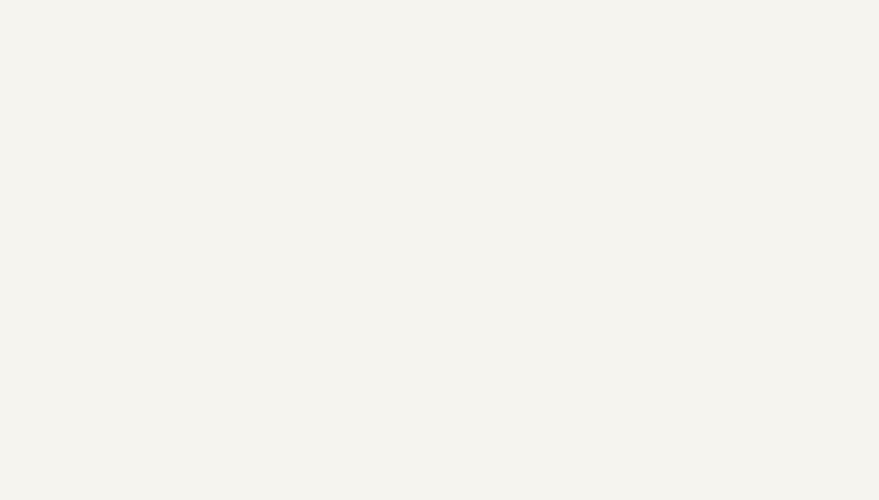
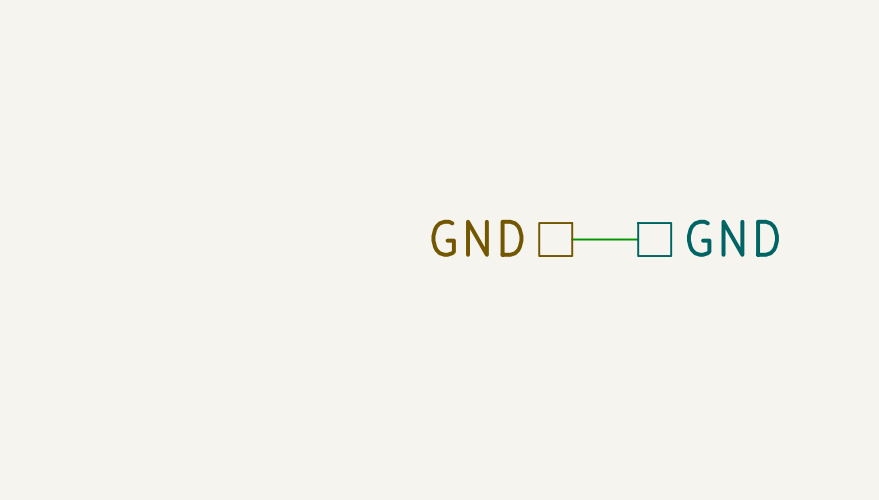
hierarchical label: none -> GND (477, 238)
sheet pin: none -> GND (732, 238)
wire: none -> (572, 239) (638, 239)

